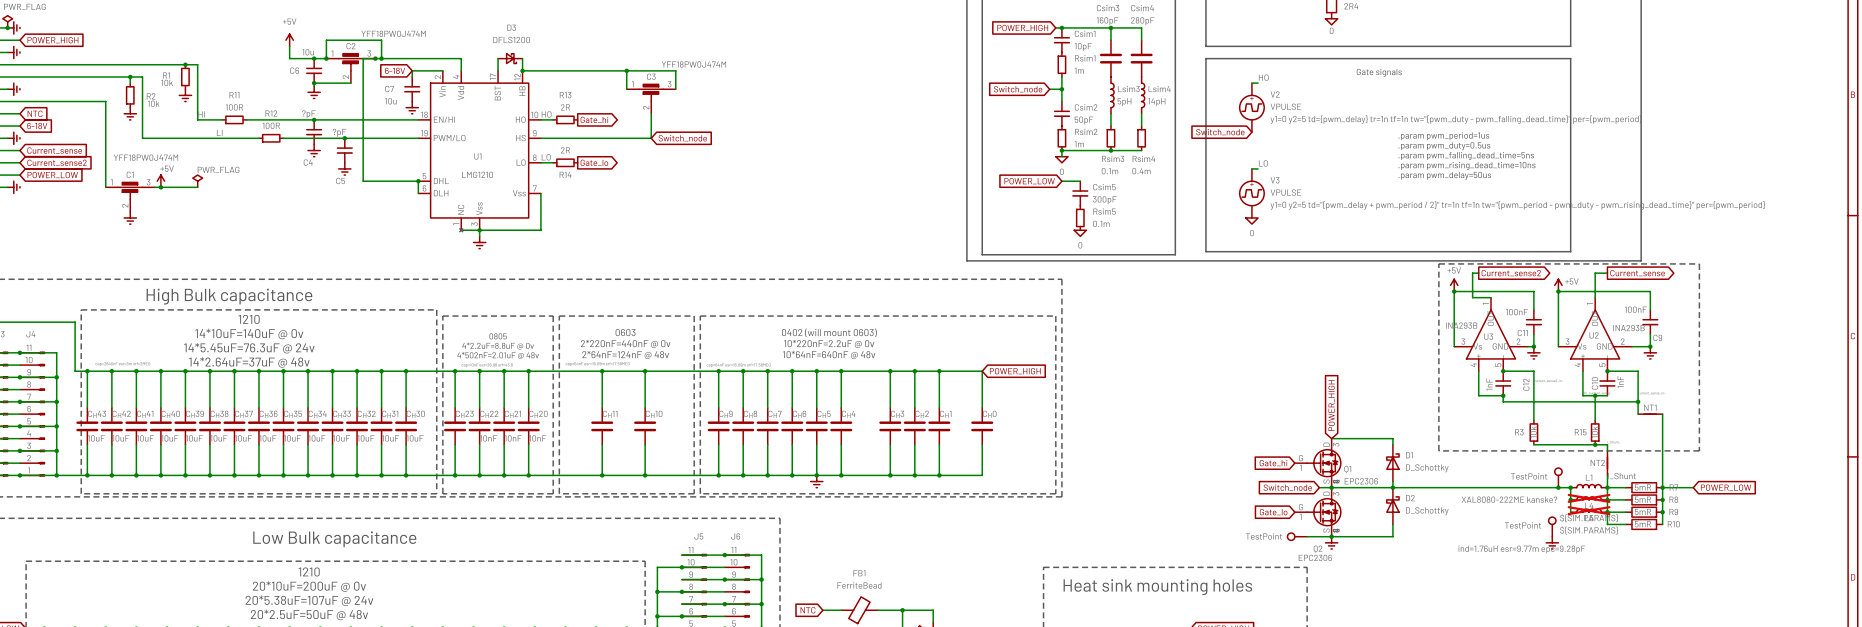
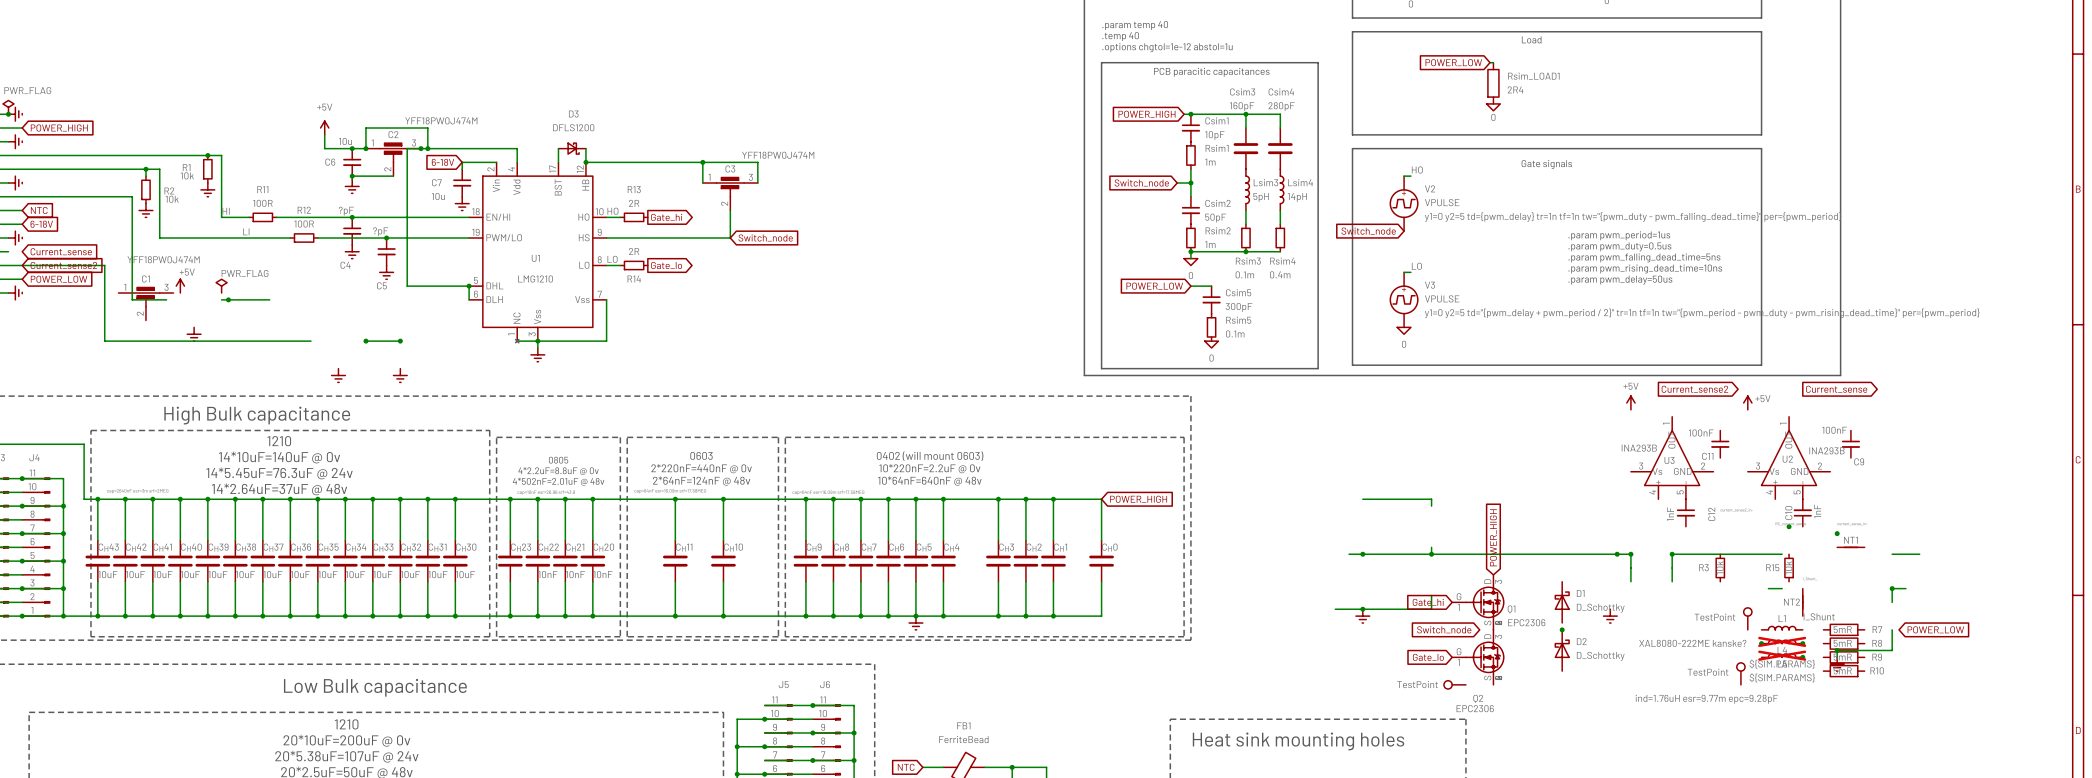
wire: (105, 101) (105, 187) -> (118, 196) (132, 196) (132, 299) (166, 299)
wire: (7, 150) (19, 150) -> none
wire: none -> (22, 265) (104, 265) (104, 341) (310, 341)
wire: (154, 187) (197, 187) -> (221, 299) (269, 299)
junction: (160, 187) -> none
junction: none -> (228, 299)
power symbol position: (130, 217) -> (194, 334)
wire: none -> (365, 341) (400, 341)
junction: none -> (365, 341)
junction: none -> (400, 341)
power symbol: none -> (338, 375)
power symbol: none -> (400, 375)
line: (1438, 263) (1699, 263) (1699, 450) (1438, 450) (1438, 263) -> none
wire: (1478, 273) (1472, 273) (1472, 297) (1490, 297) -> none
wire: (1607, 273) (1595, 273) (1595, 297) -> none
junction: (1454, 291) -> none
junction: (1558, 291) -> none
wire: (1533, 309) (1533, 291) (1454, 291) (1454, 346) -> none
wire: (1650, 309) (1650, 291) (1558, 291) (1558, 346) -> none
wire: (1533, 334) (1533, 346) (1527, 346) -> none
wire: (1650, 334) (1650, 346) (1631, 346) -> none
junction: (1533, 346) -> none
junction: (1650, 346) -> none
power symbol: (1533, 352) -> none
power symbol: (1650, 352) -> none
wire: none -> (1362, 499) (1431, 499) (1431, 506)
wire: (1478, 371) (1478, 395) (1503, 395) (1503, 401) (1638, 401) -> none
wire: (1503, 371) (1533, 371) (1533, 420) -> none
junction: (1503, 371) -> none
wire: (1582, 371) (1582, 395) (1607, 395) -> none
wire: (1607, 371) (1638, 371) (1638, 414) -> none
junction: (1607, 371) -> none
junction: (1503, 395) -> none
wire: (1595, 395) (1595, 420) -> none
wire: none -> (1431, 547) (1431, 554)
wire: (1662, 414) (1662, 524) -> none
wire: none -> (1349, 554) (1630, 554) (1630, 581)
junction: none -> (1362, 554)
junction: none -> (1431, 554)
junction: none -> (1617, 554)
junction: none -> (1630, 554)
junction: none -> (1672, 554)
wire: none -> (1782, 554) (1672, 554) (1672, 581)
wire: none -> (1892, 554) (1919, 554)
wire: (1331, 438) (1392, 438) (1392, 444) -> none
wire: (1533, 444) (1607, 444) (1607, 450) -> none
junction: (1595, 444) -> none
junction: none -> (1892, 588)
wire: none -> (1905, 588) (1892, 588) (1892, 602)
wire: none -> (1431, 595) (1431, 609) (1335, 609)
junction: none -> (1362, 609)
power symbol: none -> (1362, 616)
power symbol: none -> (1610, 616)
wire: (1607, 475) (1607, 524) (1625, 524) -> none
wire: (1392, 481) (1392, 487) -> none
wire: (1319, 487) (1570, 487) (1570, 512) -> none
junction: (1331, 487) -> none
junction: (1558, 487) -> none
junction: (1570, 487) -> none
wire: (1607, 487) (1625, 487) -> none
junction: (1607, 487) -> none
wire: (1662, 487) (1693, 487) -> none
junction: (1662, 487) -> none
wire: none -> (1892, 629) (1892, 650) (1837, 650) (1837, 657)
wire: (1607, 499) (1625, 499) -> none
junction: (1662, 499) -> none
junction: none -> (1837, 650)
wire: (1607, 512) (1625, 512) -> none
junction: (1662, 512) -> none
power symbol: none -> (1837, 664)
wire: (1392, 524) (1392, 536) (1307, 536) -> none
junction: (1331, 536) -> none
power symbol: (1331, 542) -> none
power symbol: (1552, 542) -> none

